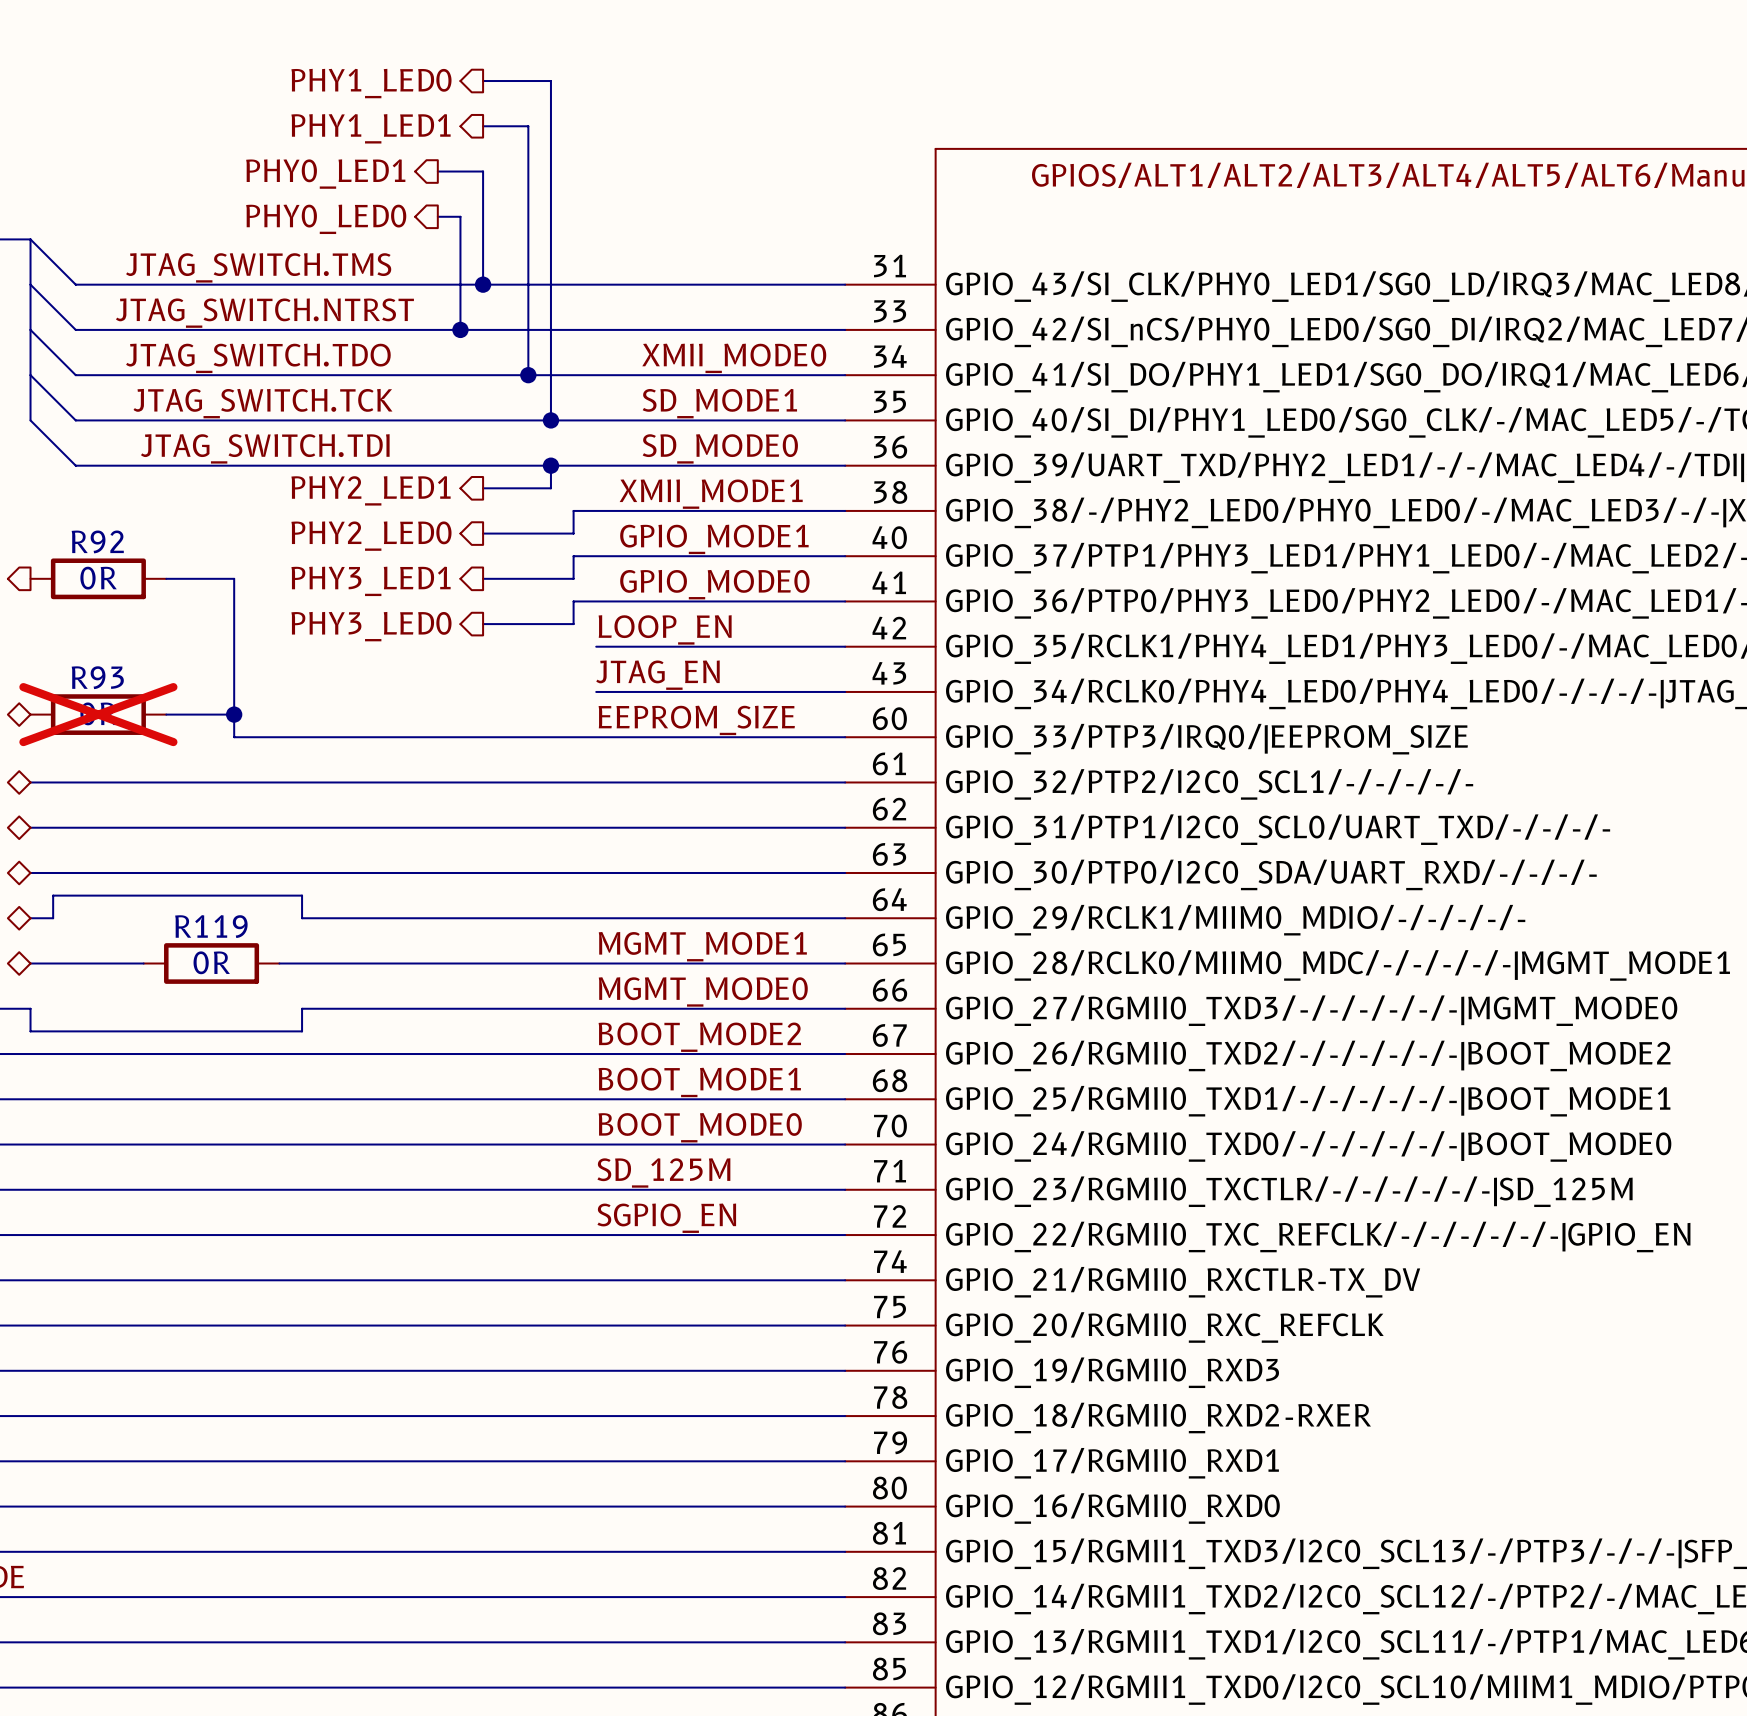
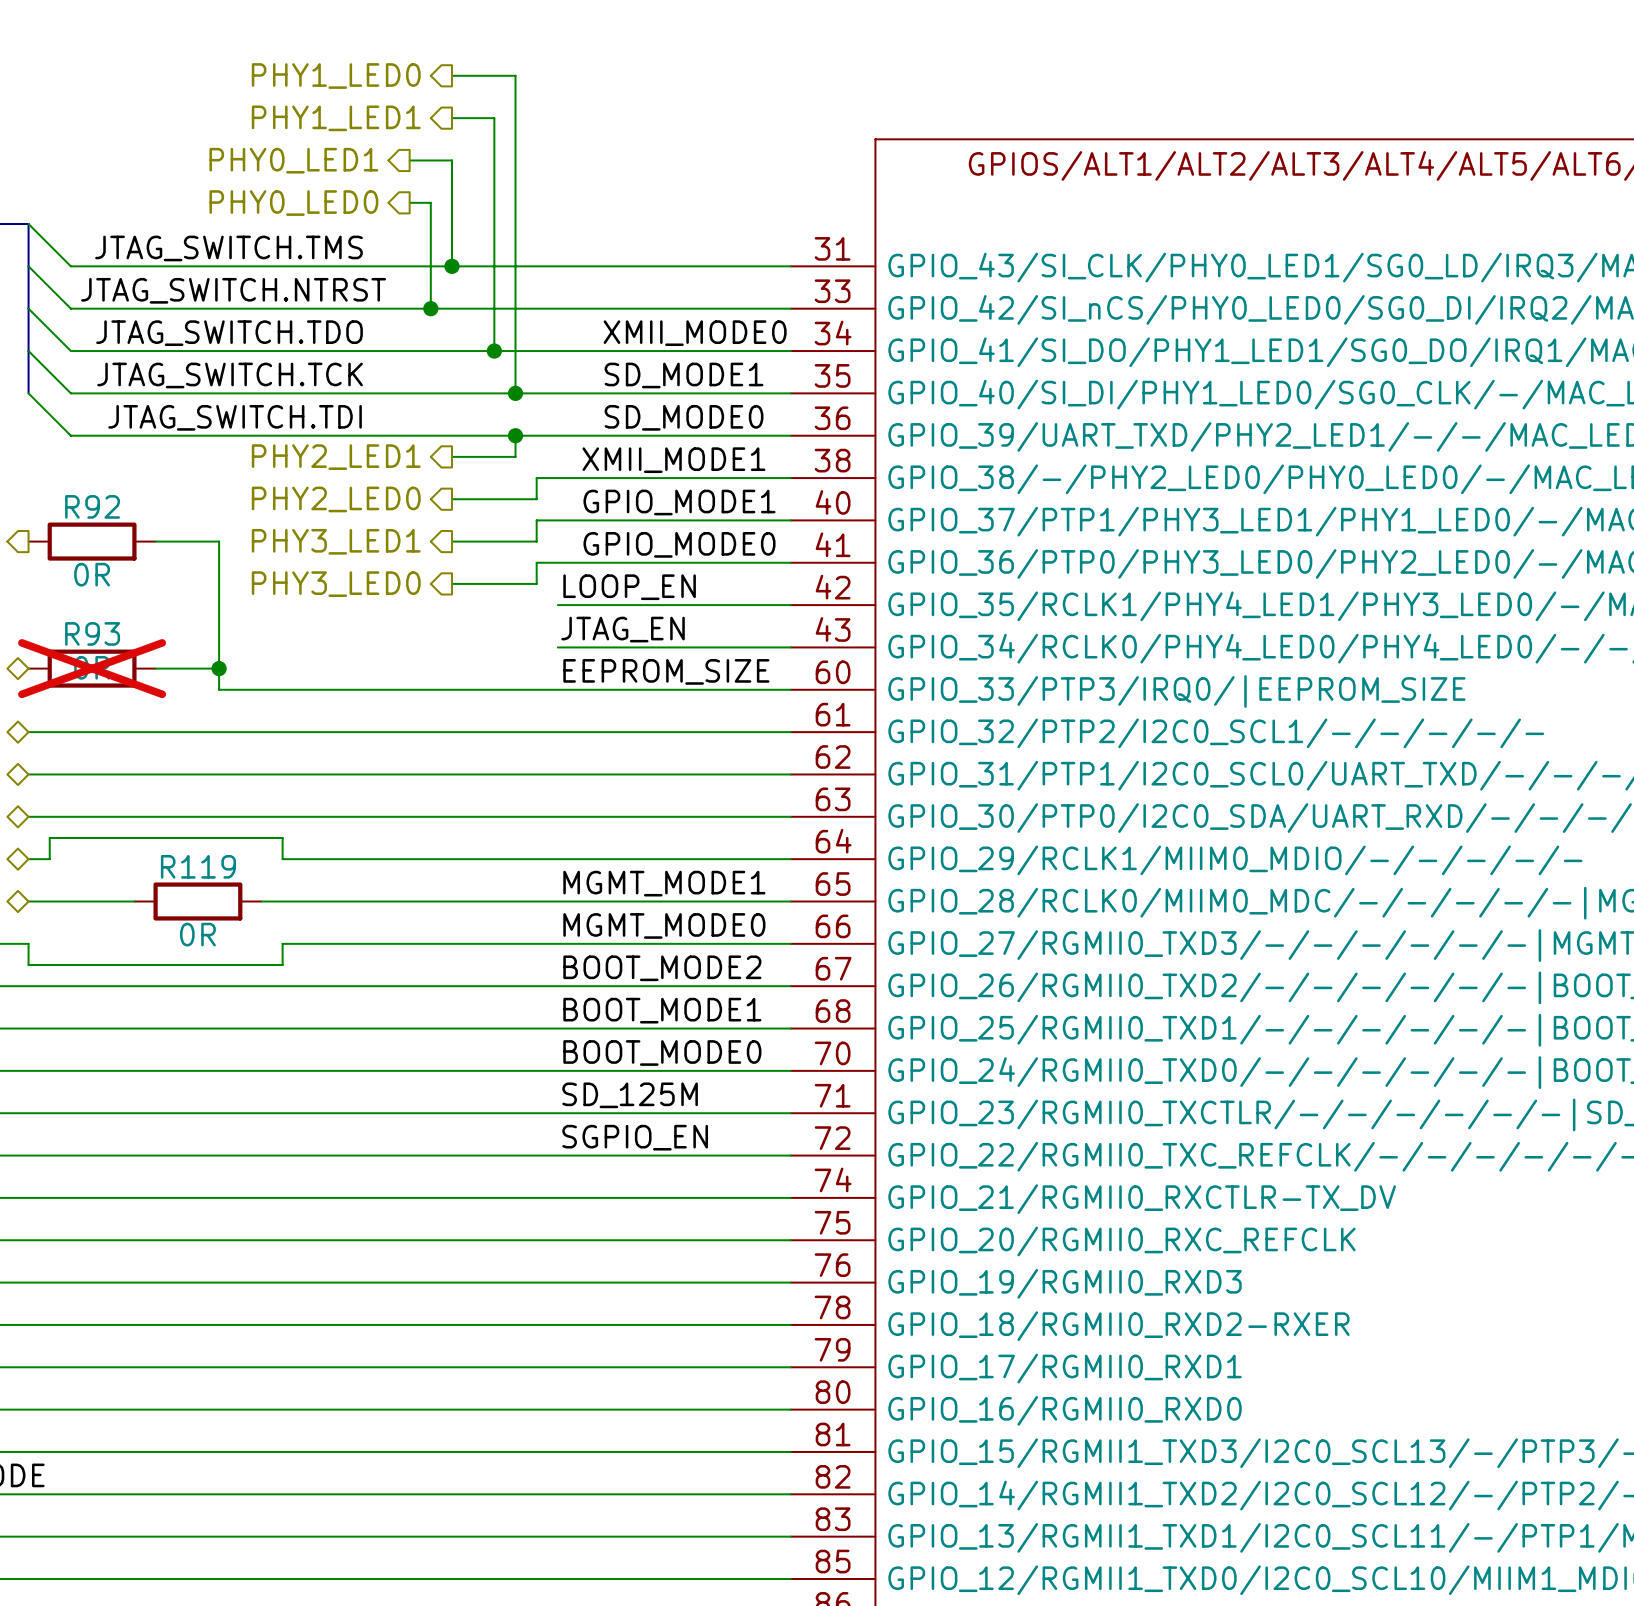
R92 value position: 0R (98, 578) -> 0R (92, 574)
R119 value position: 0R (211, 962) -> 0R (197, 934)

